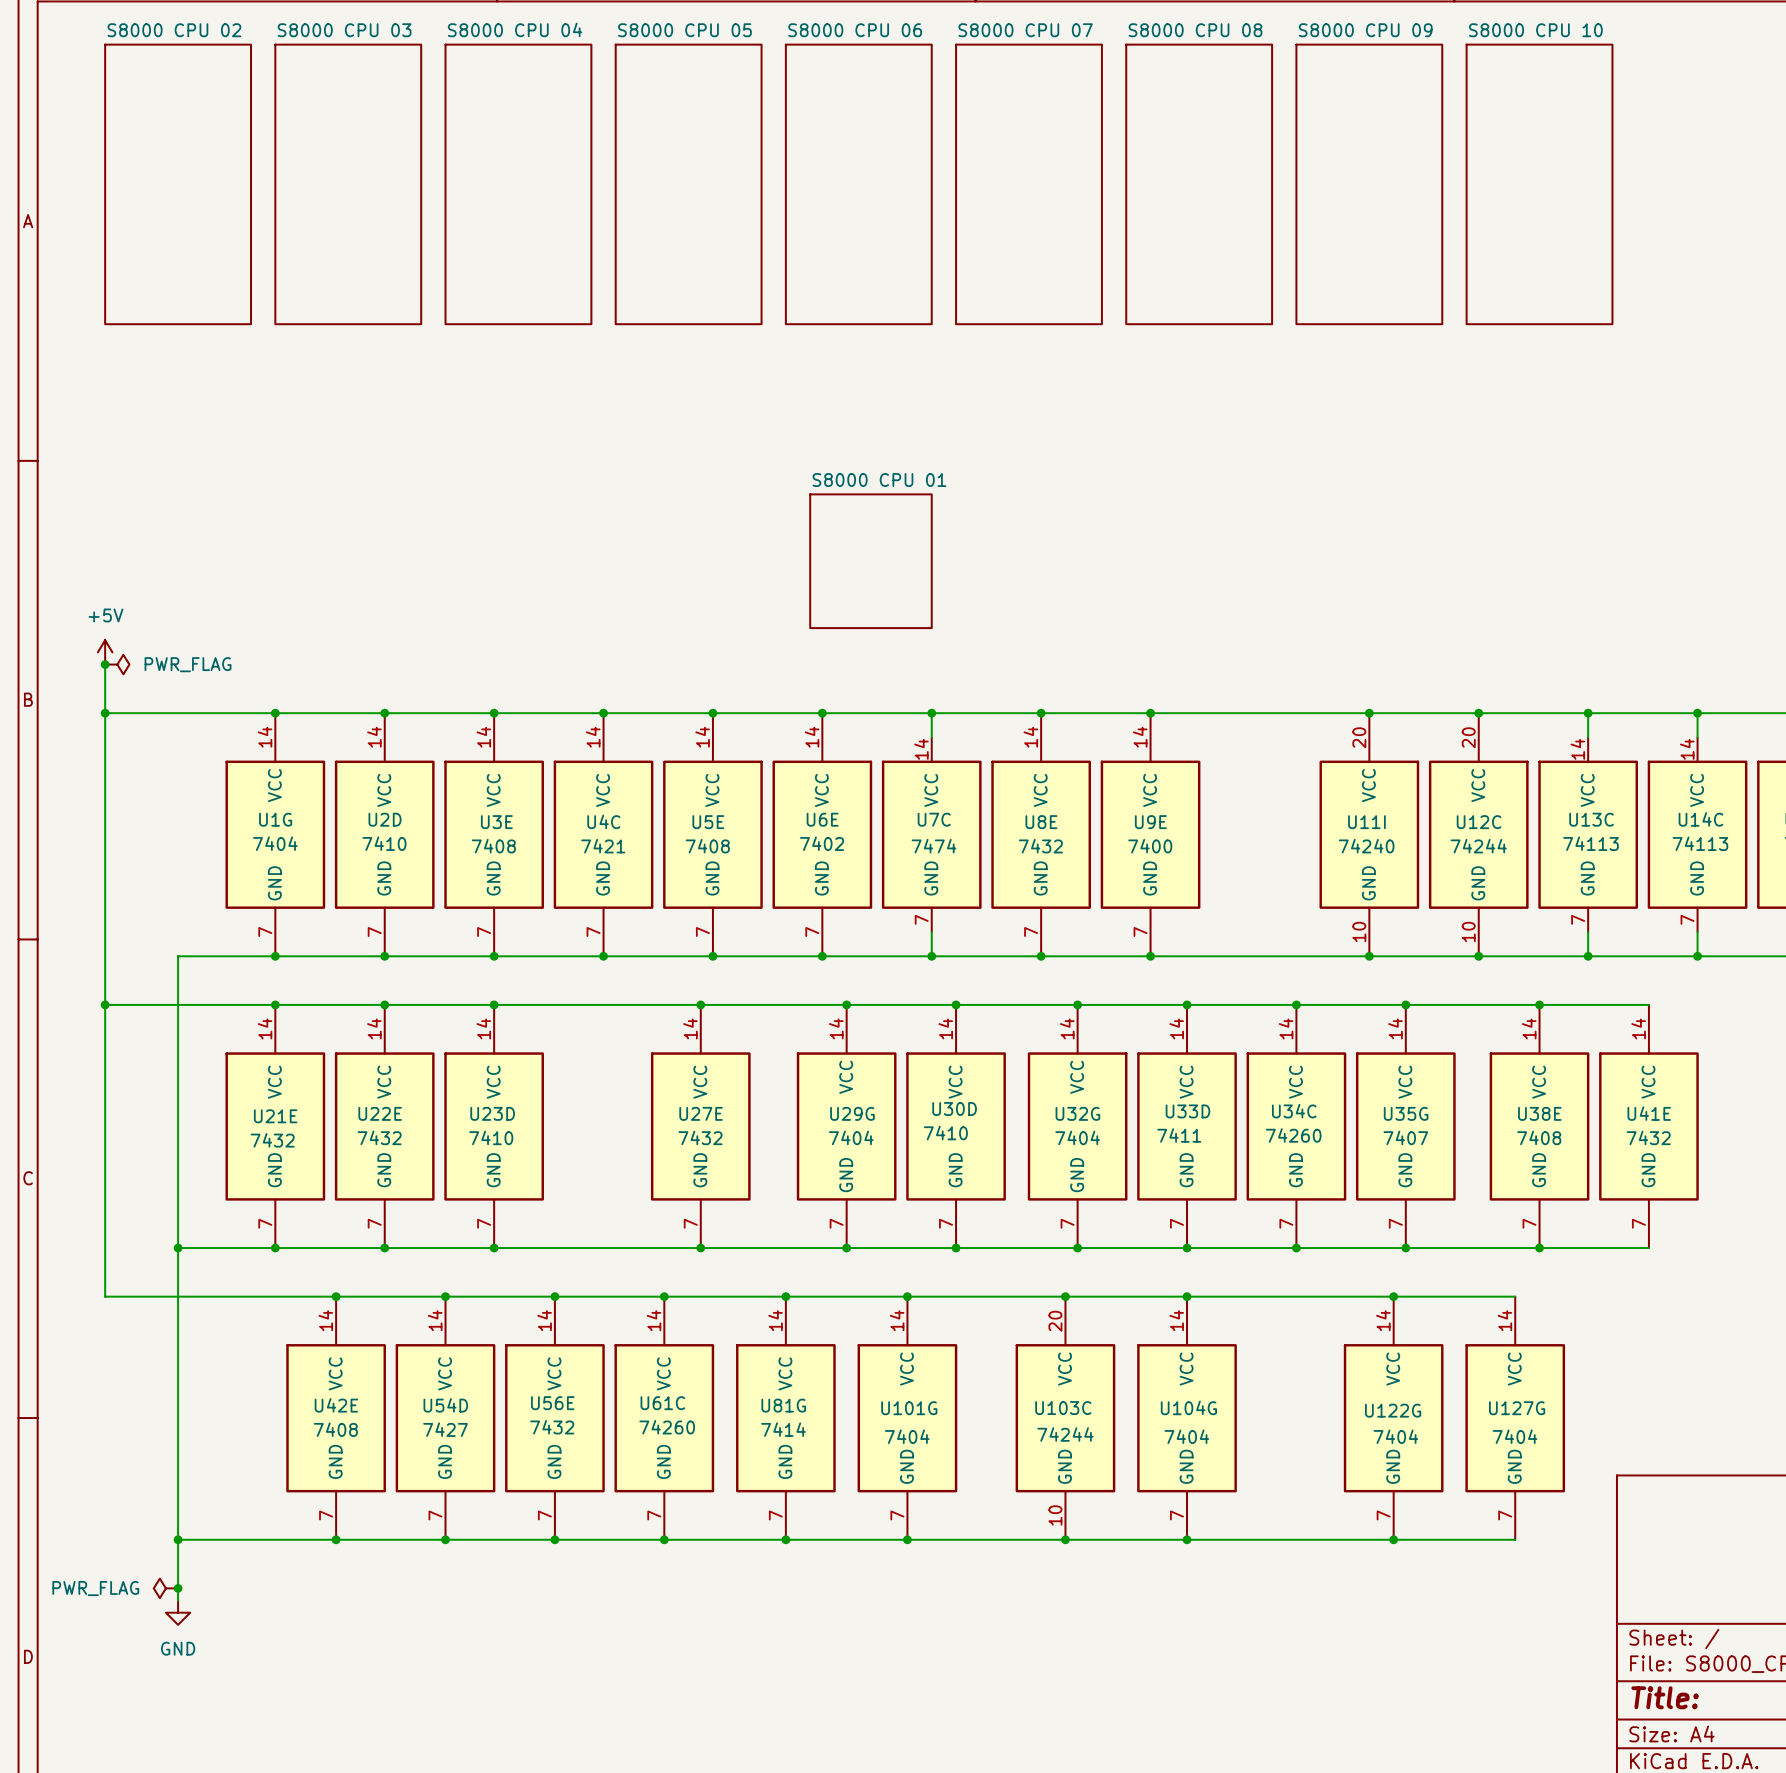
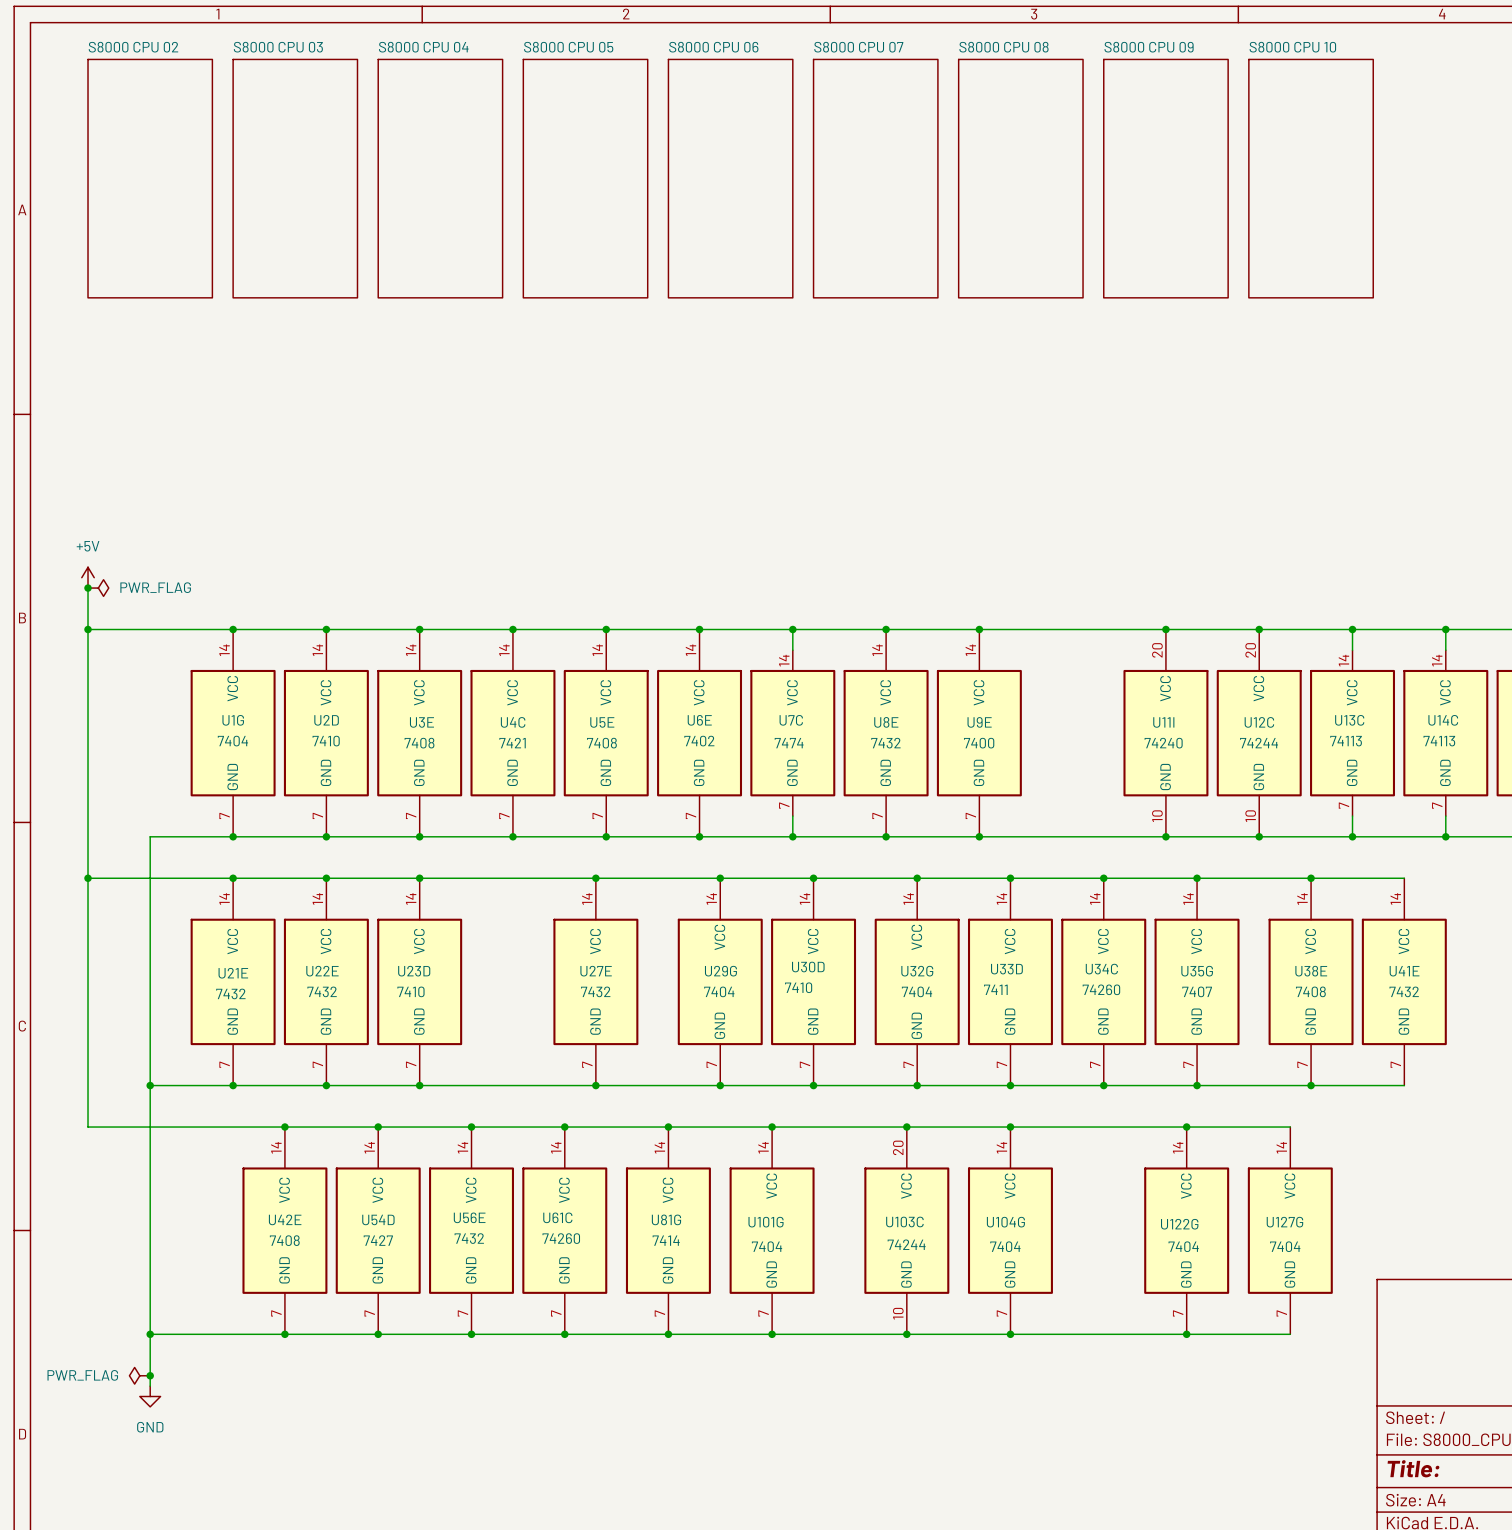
sheet S8000 CPU 01: (870, 561) -> none

